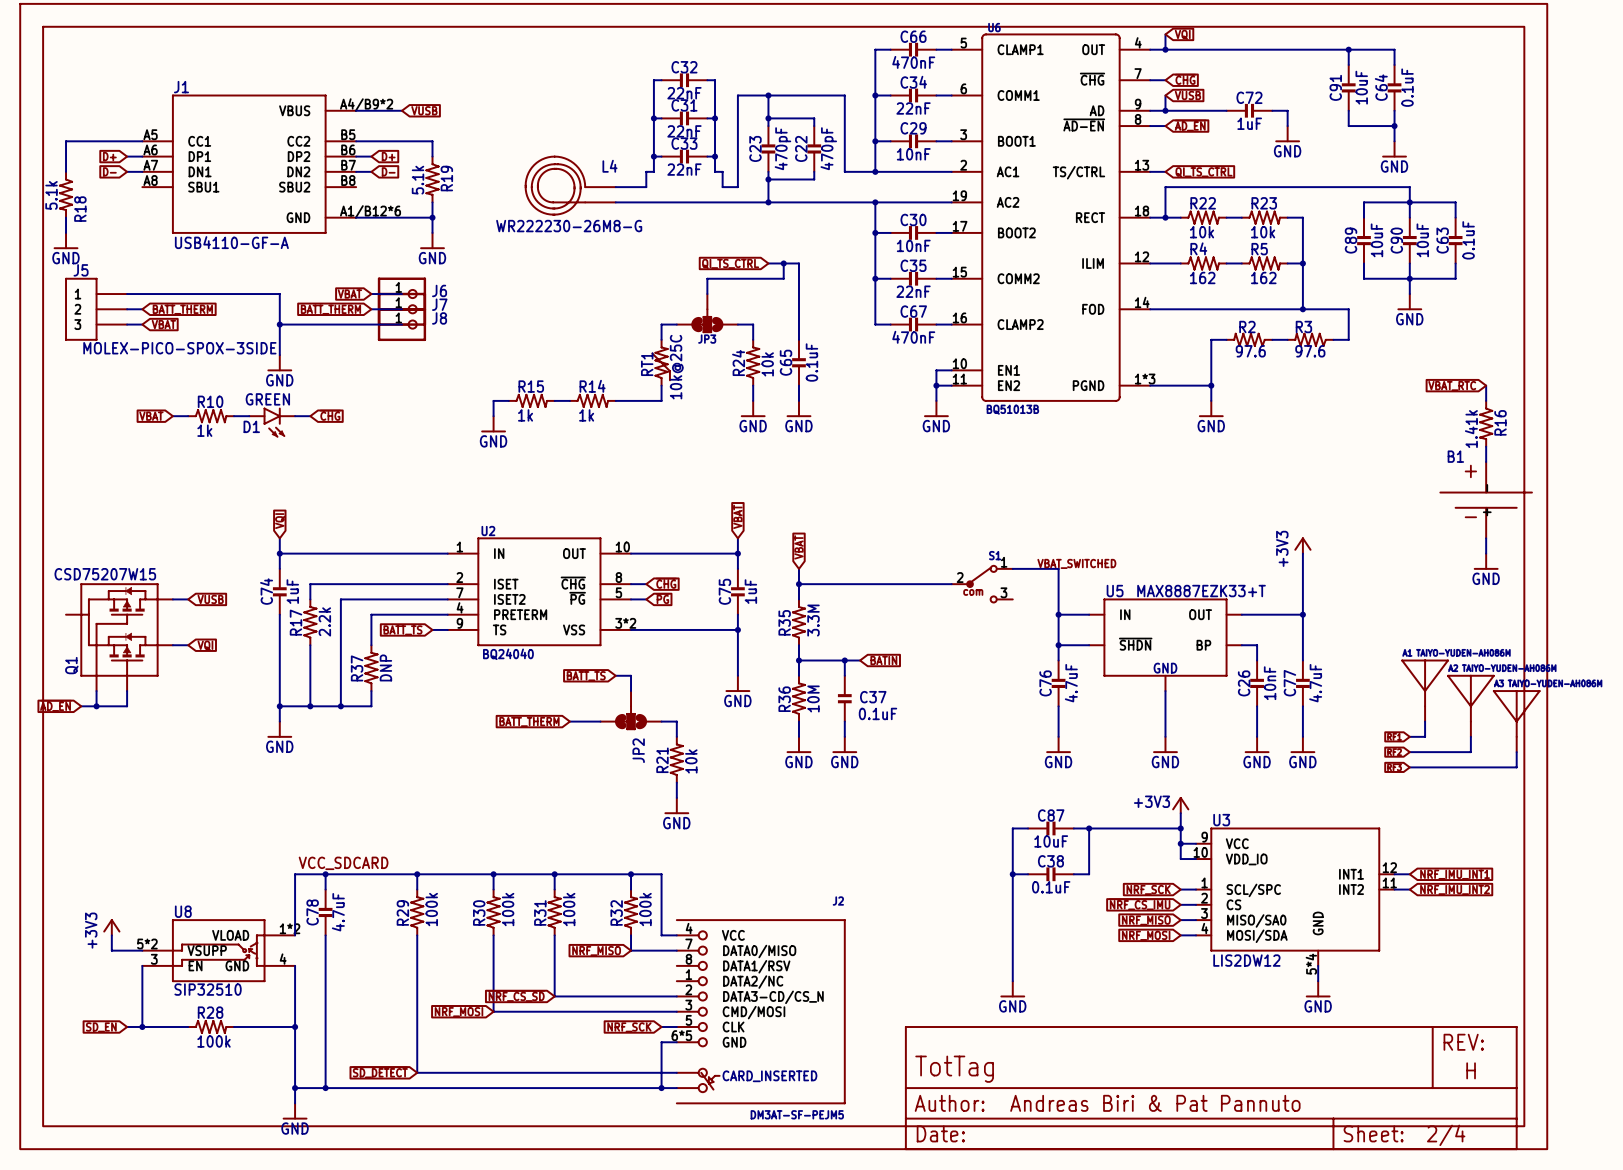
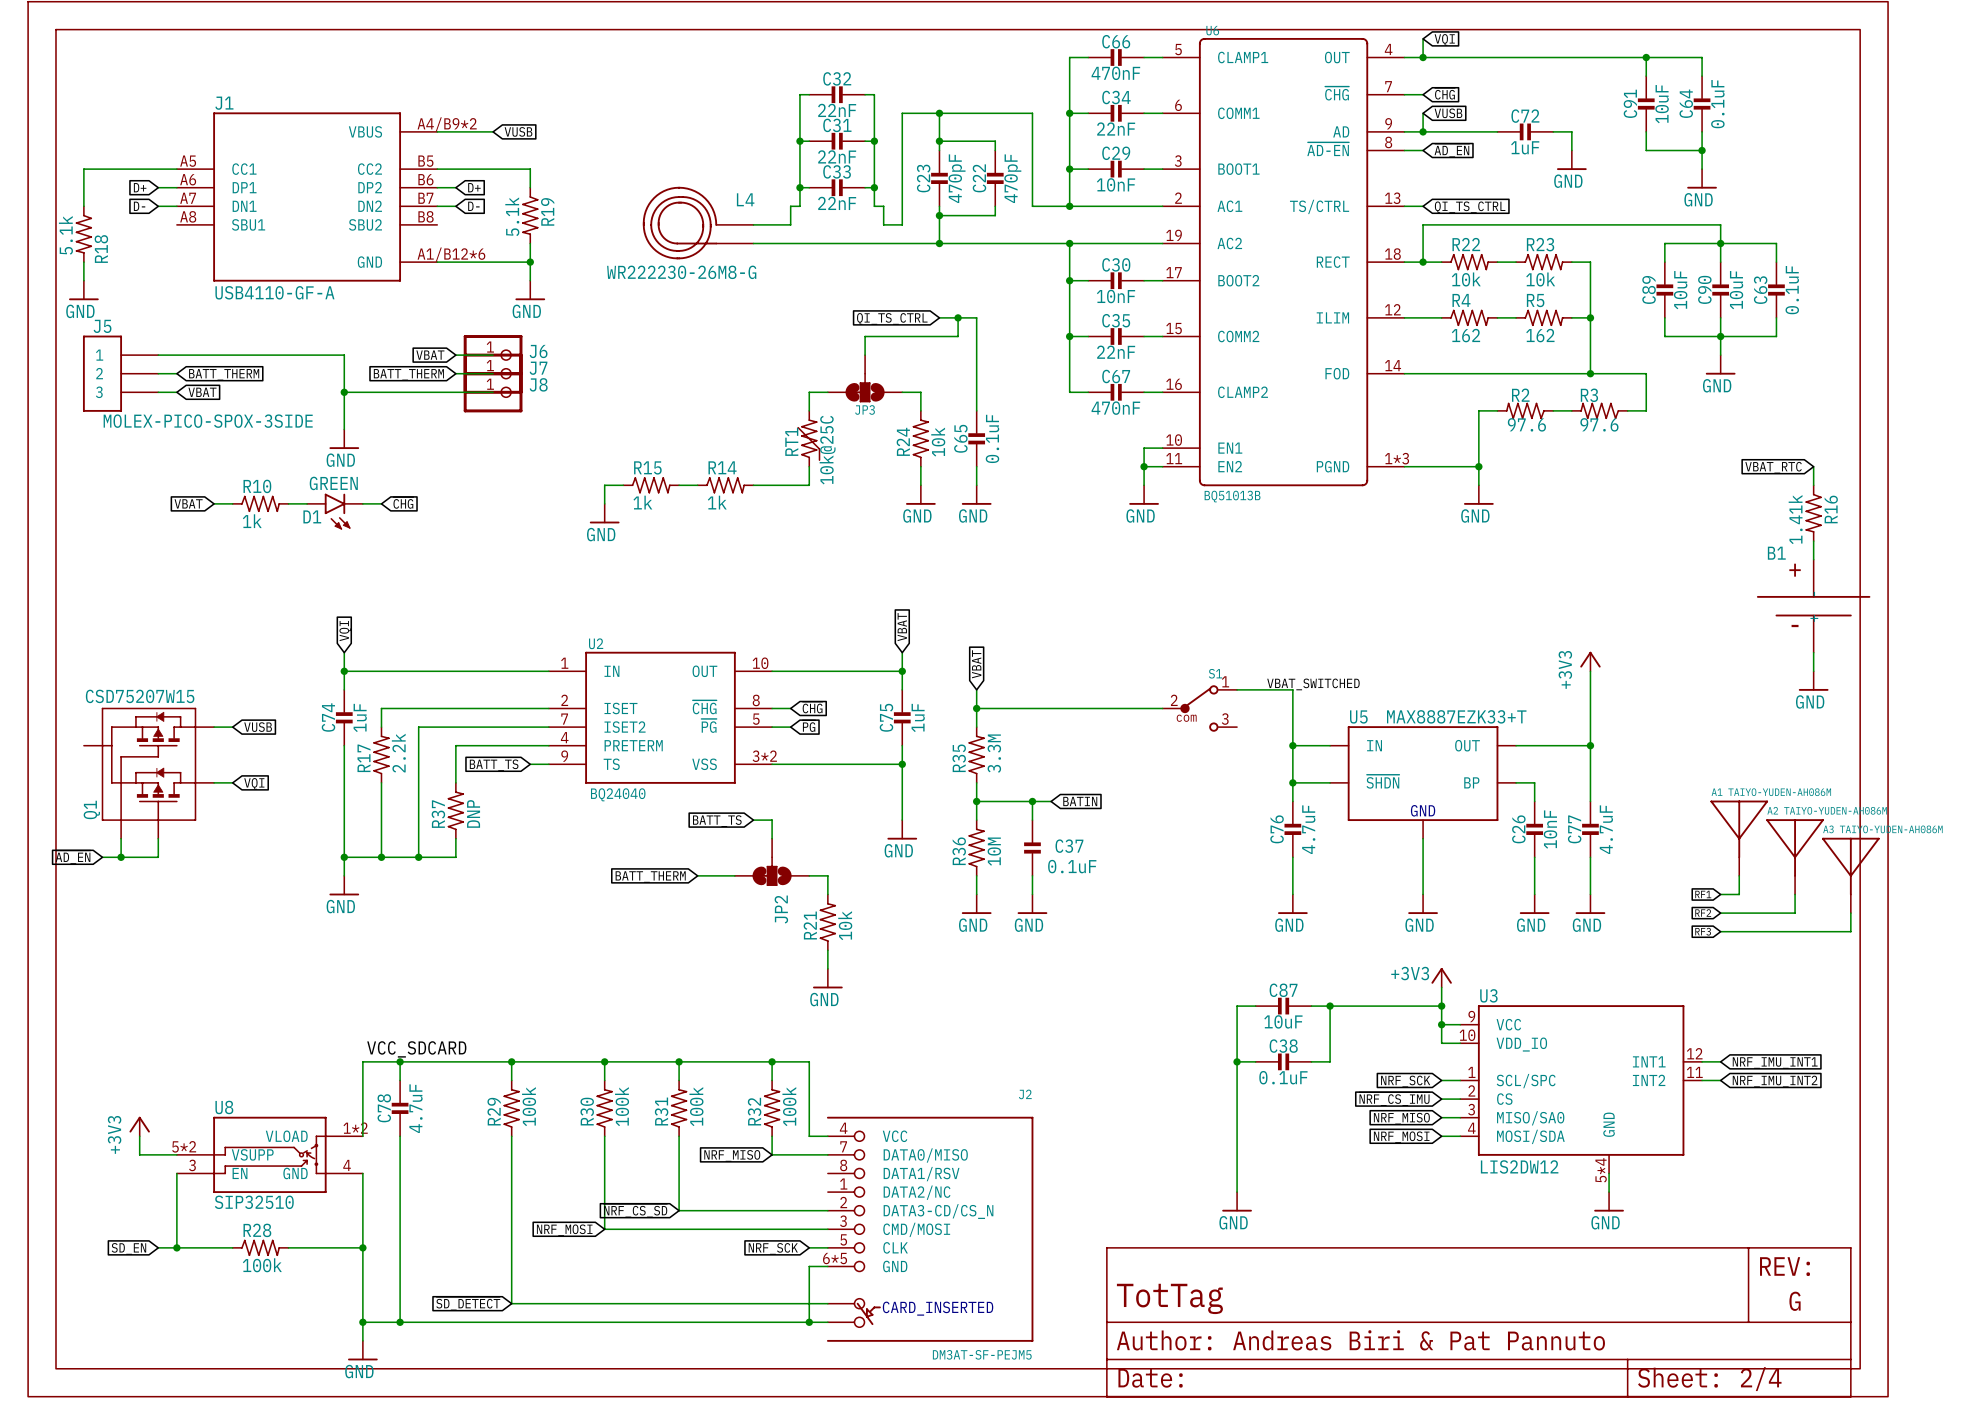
part text: H (1471, 1070) -> G (1795, 1301)

